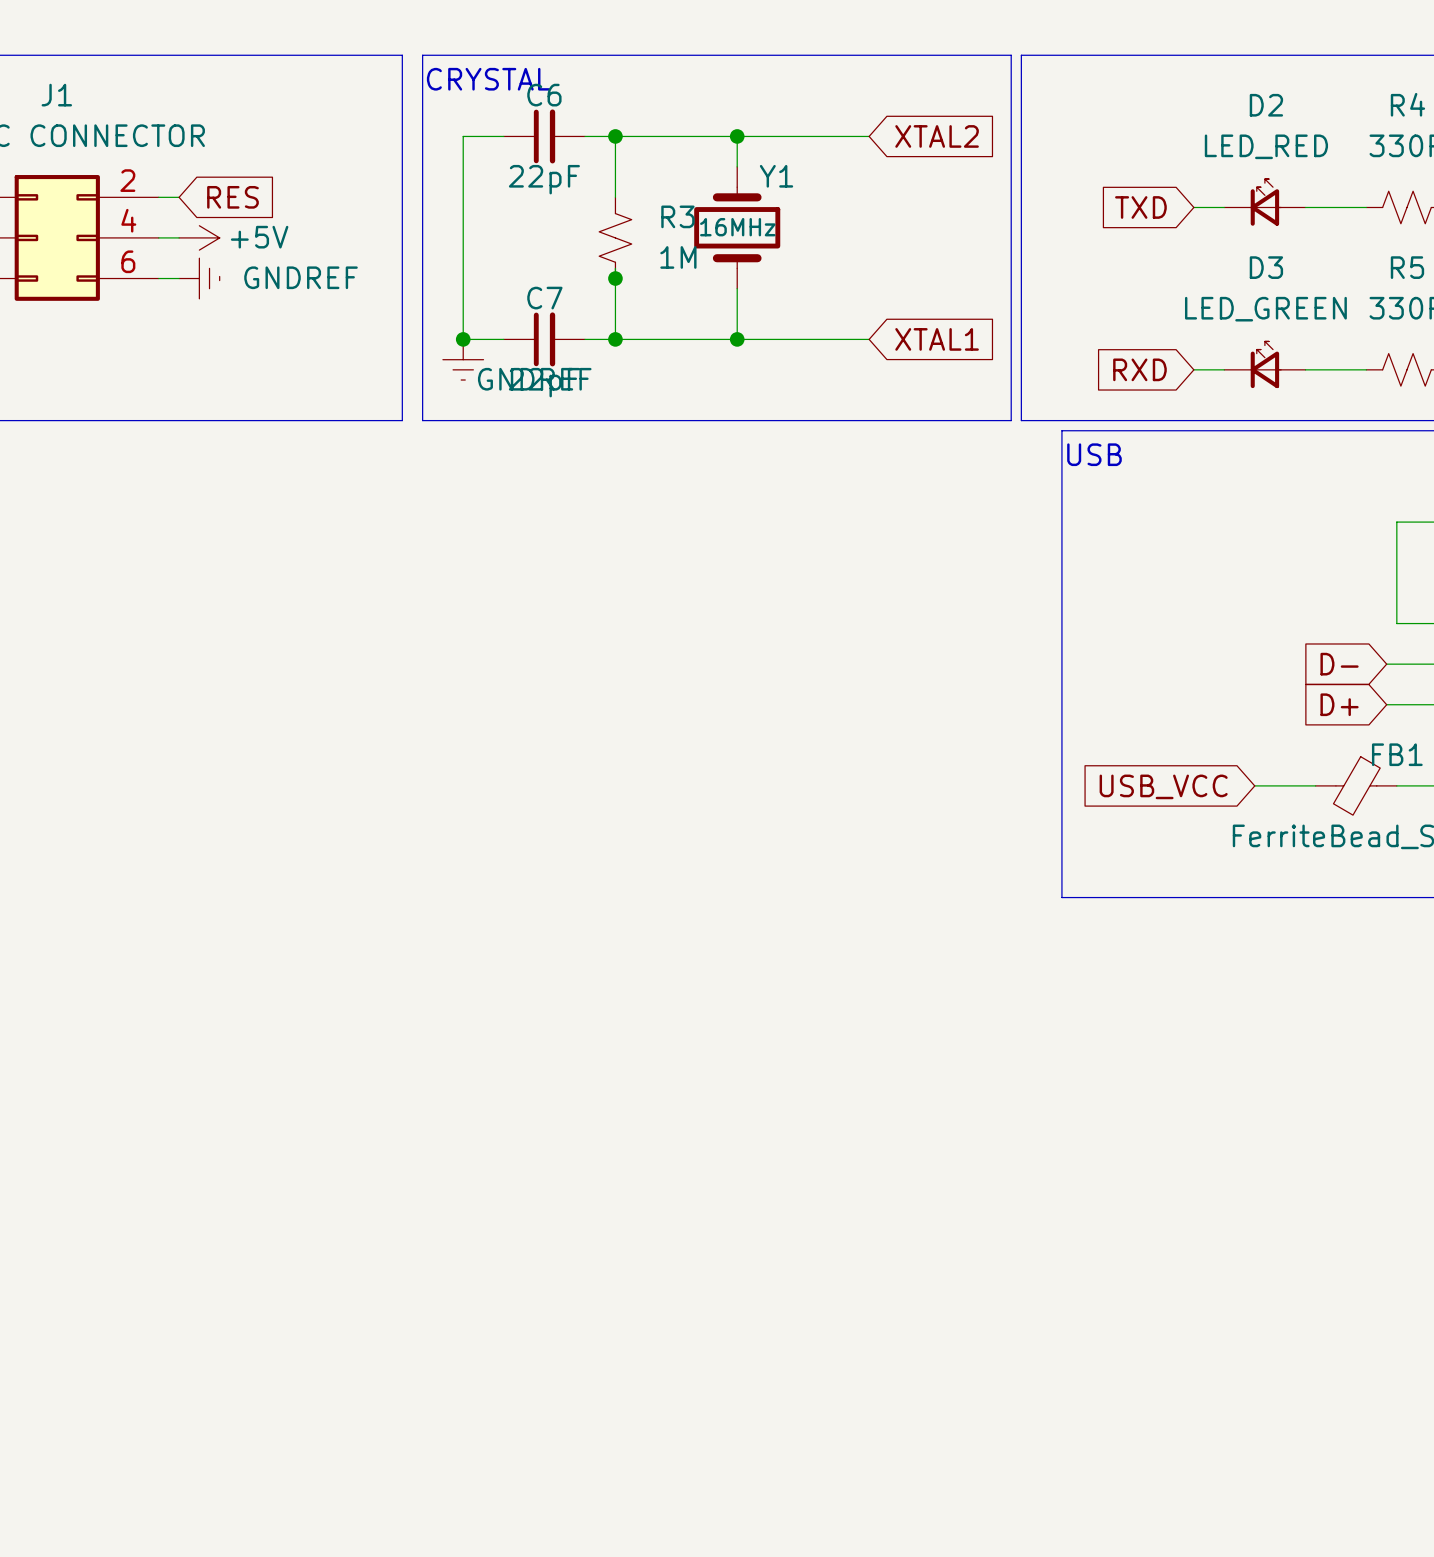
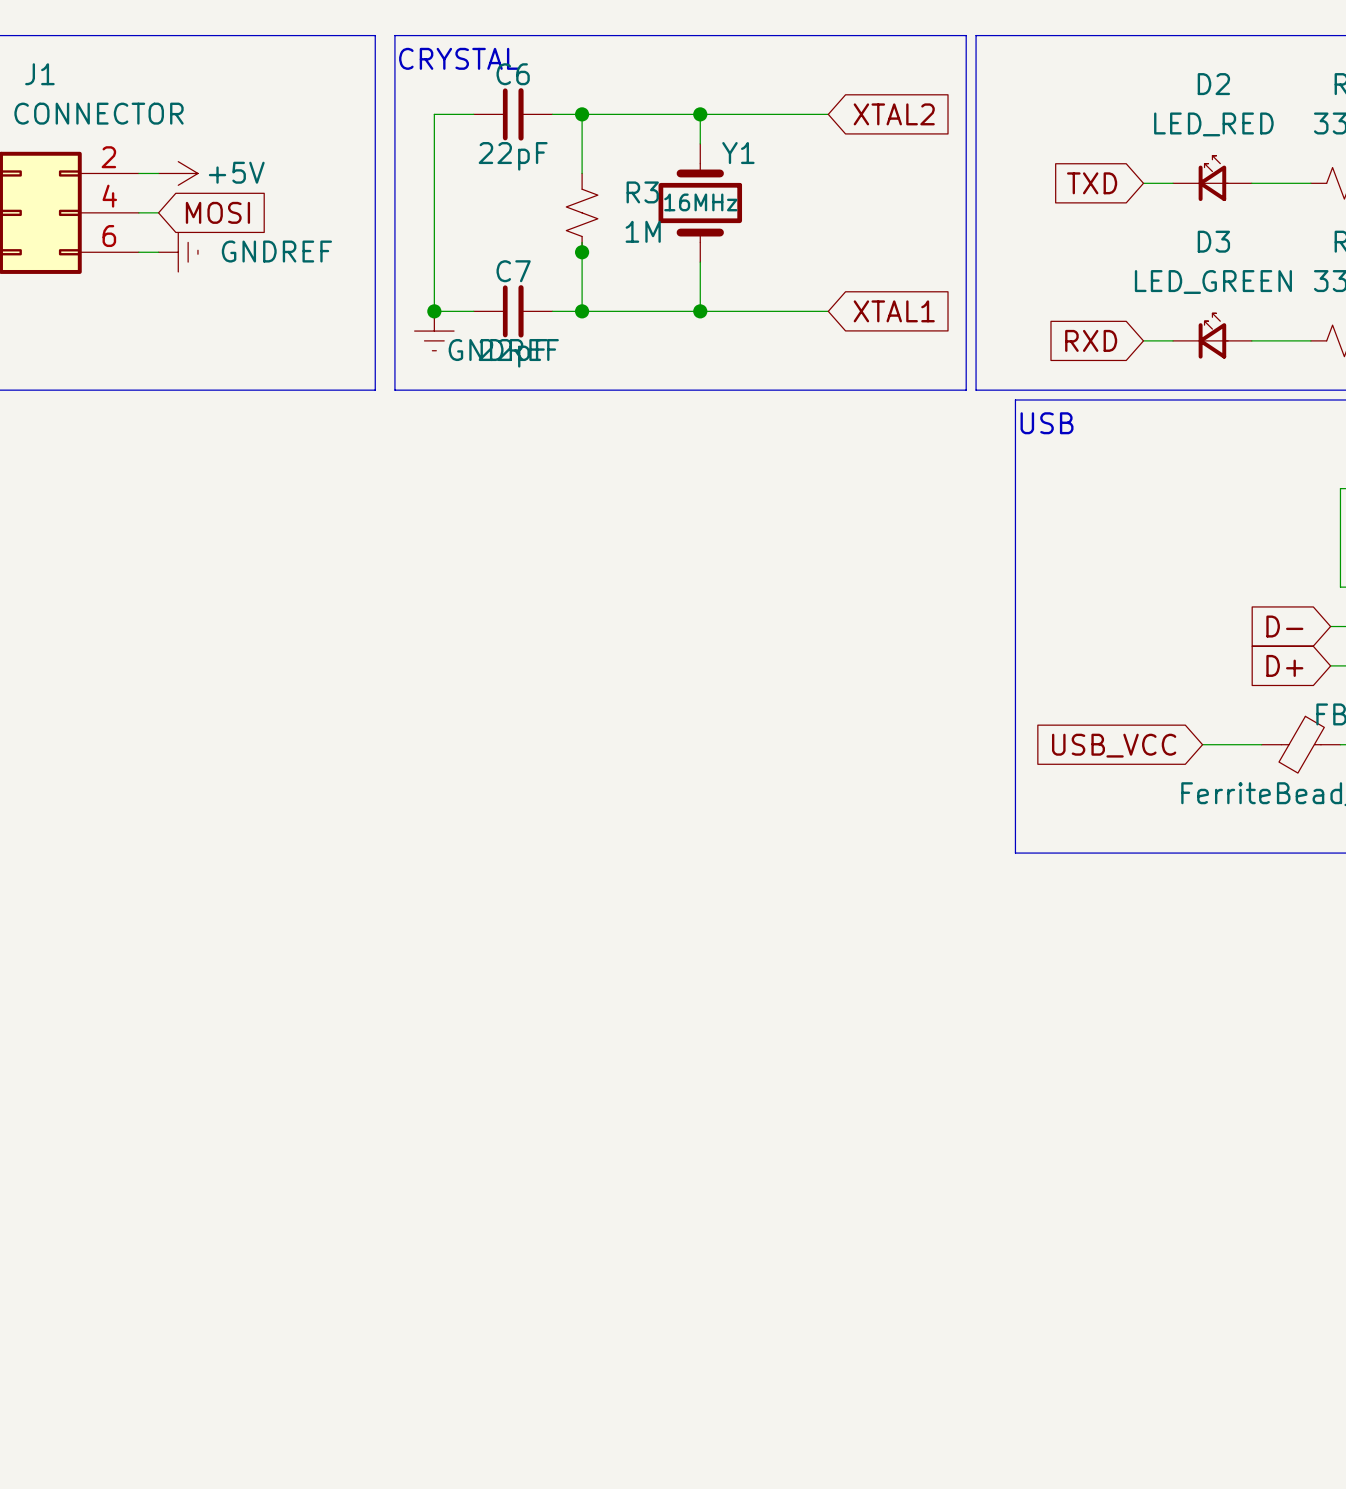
global label: RES (232, 197) -> none
power symbol position: +5V (199, 237) -> +5V (178, 173)
global label: none -> MOSI (217, 212)

